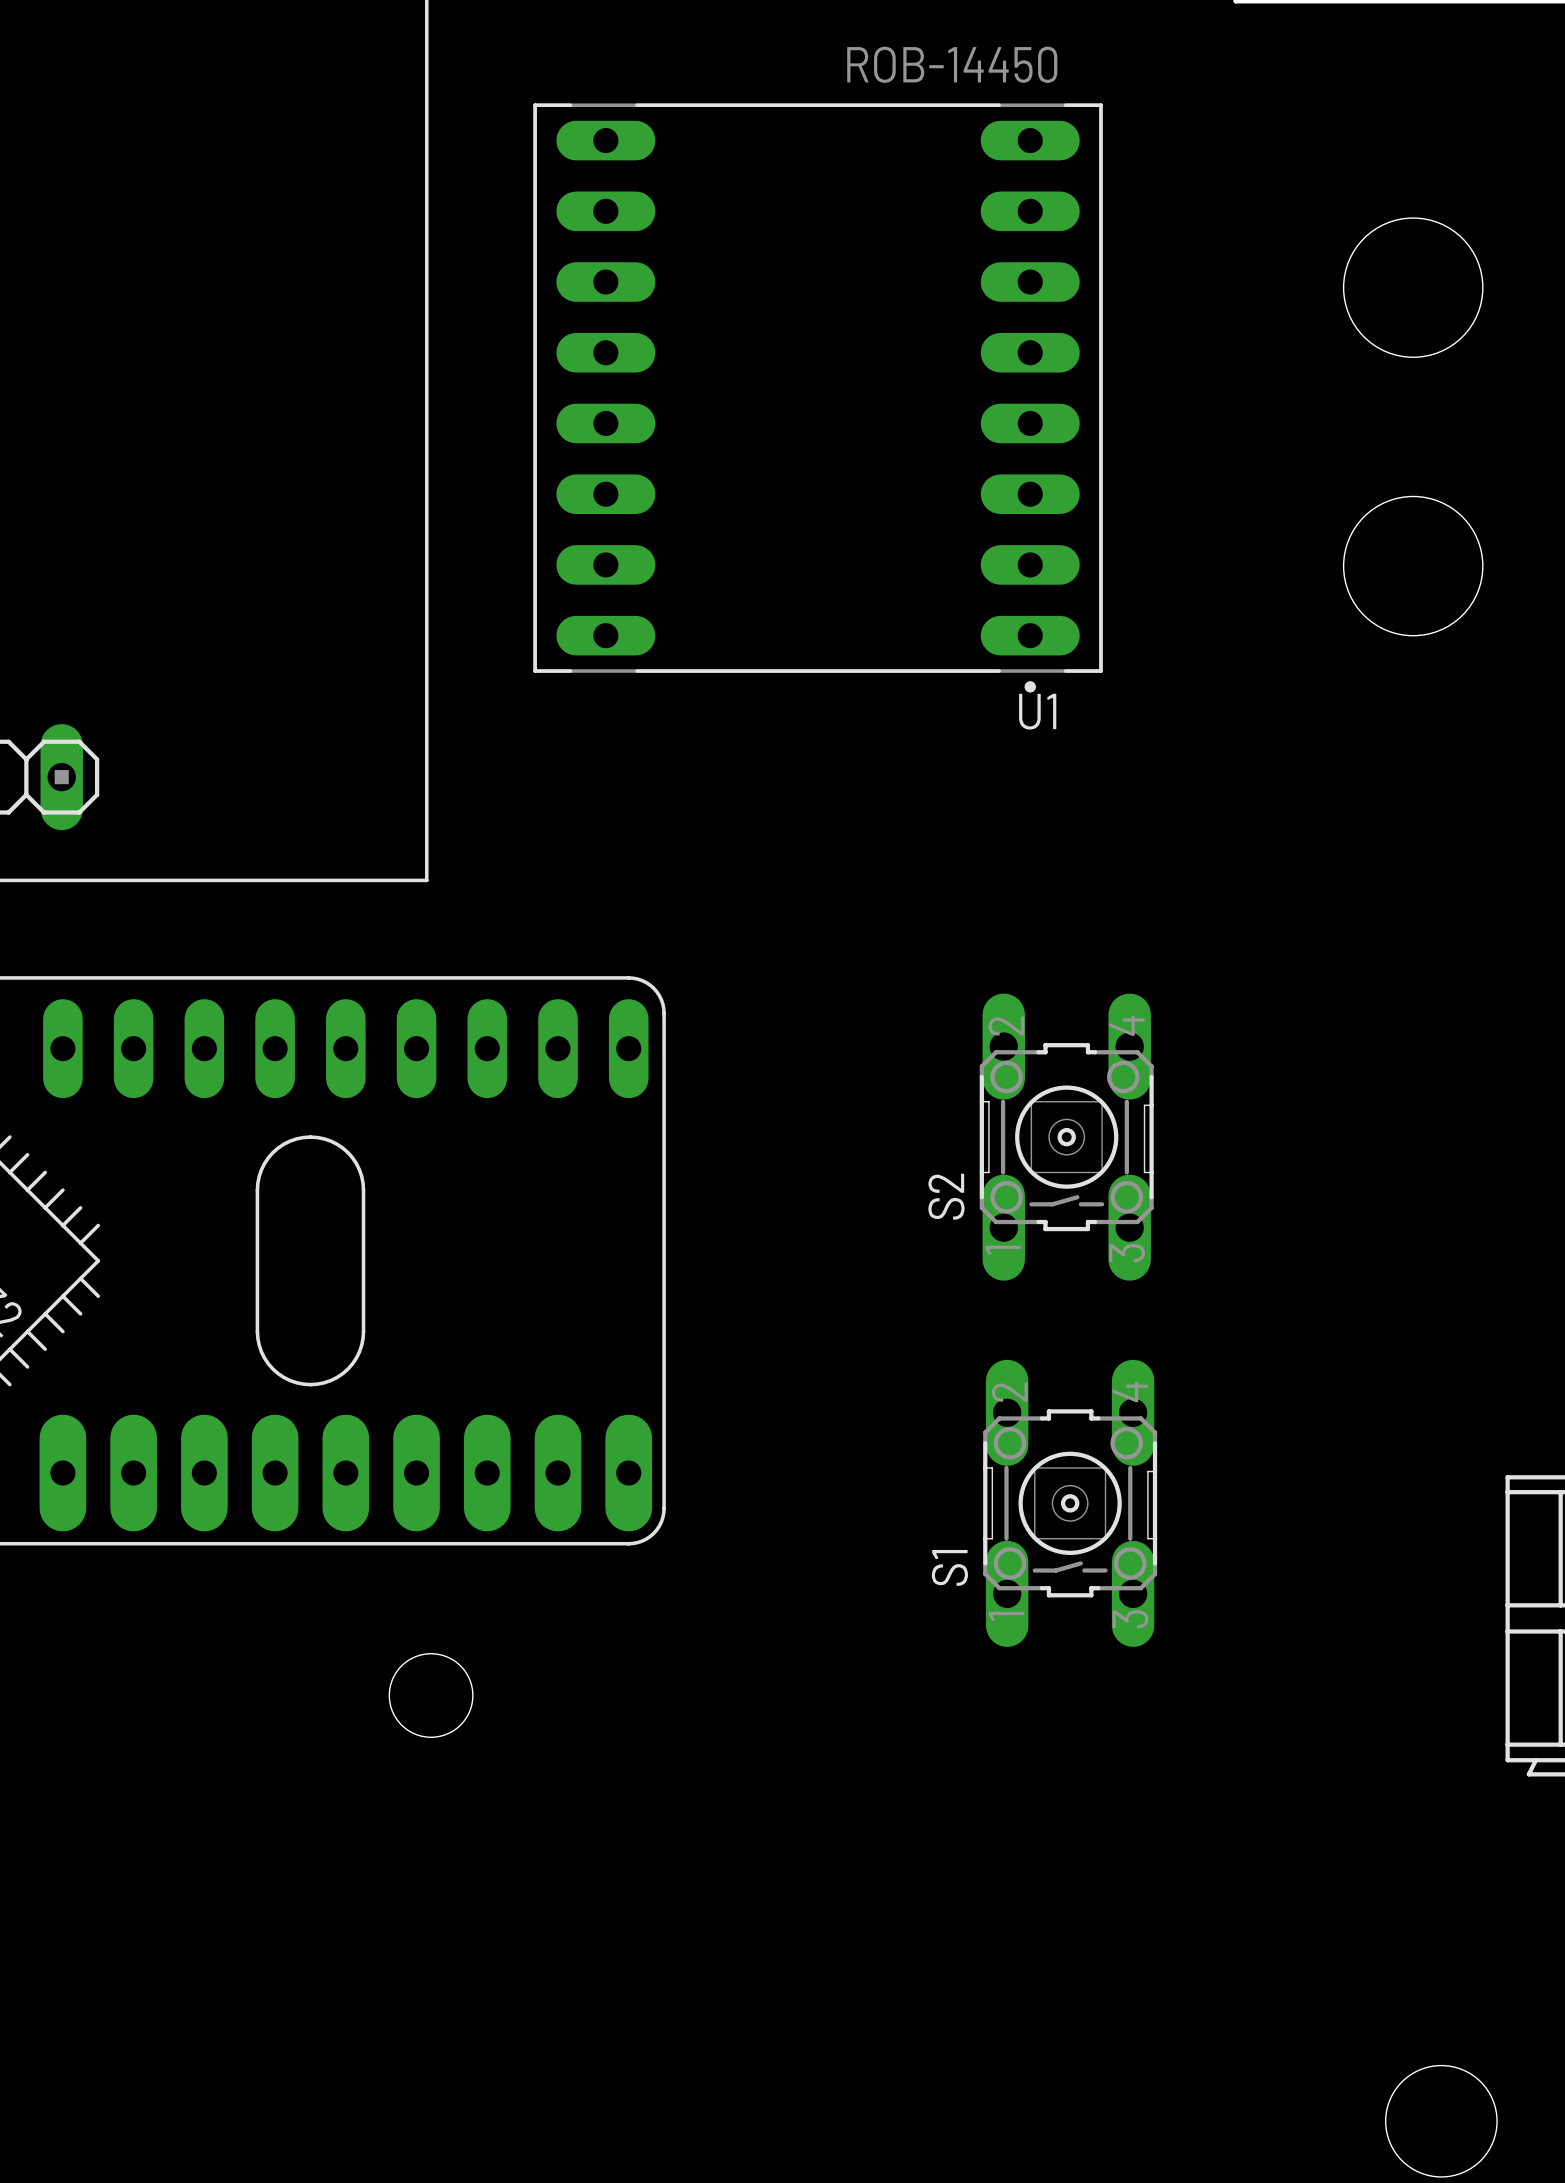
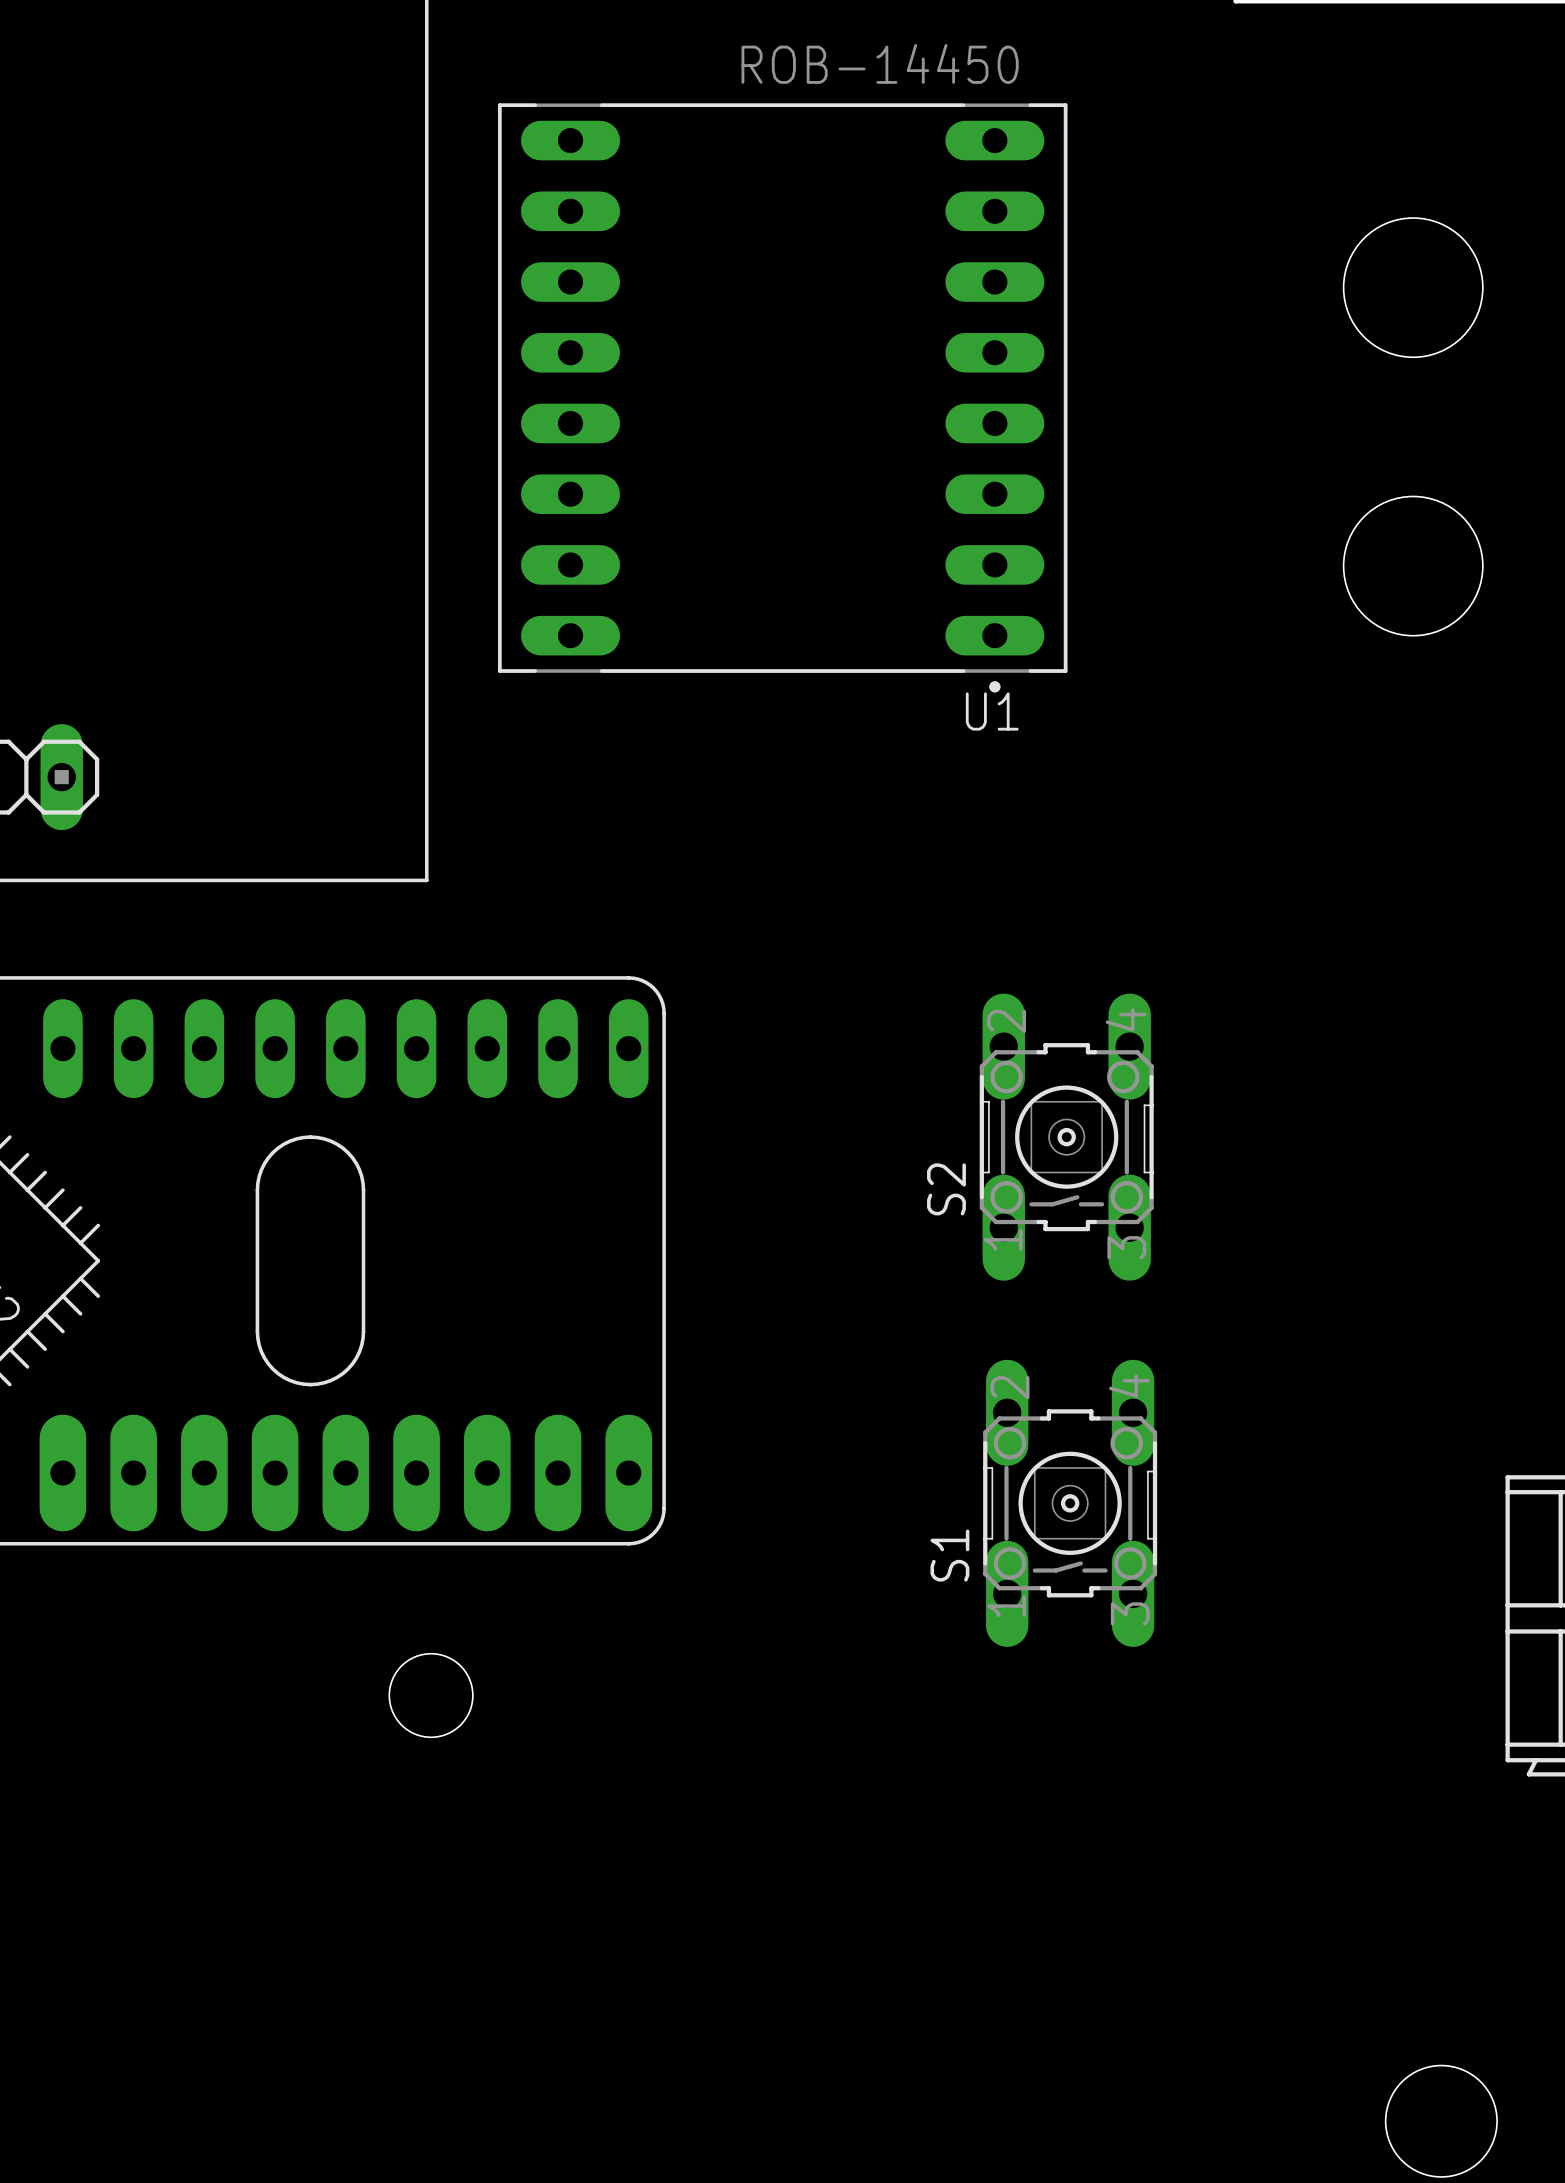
U1 position: (818, 397) -> (782, 397)

